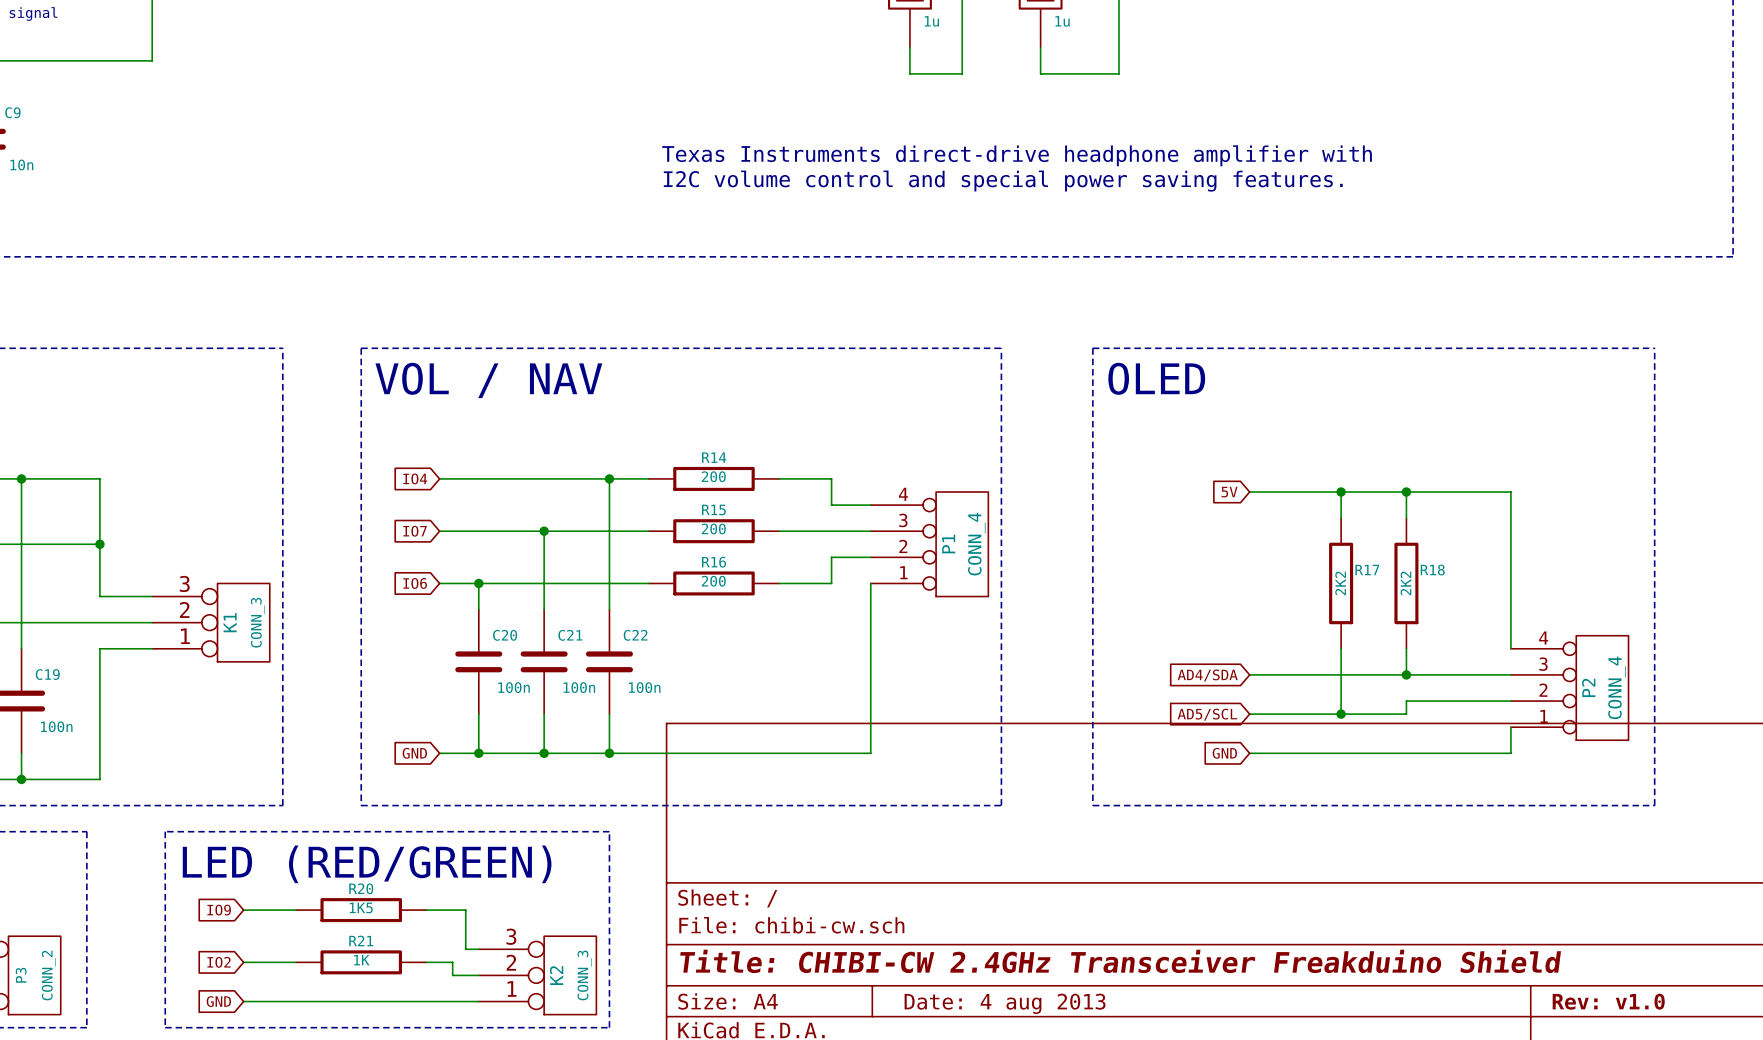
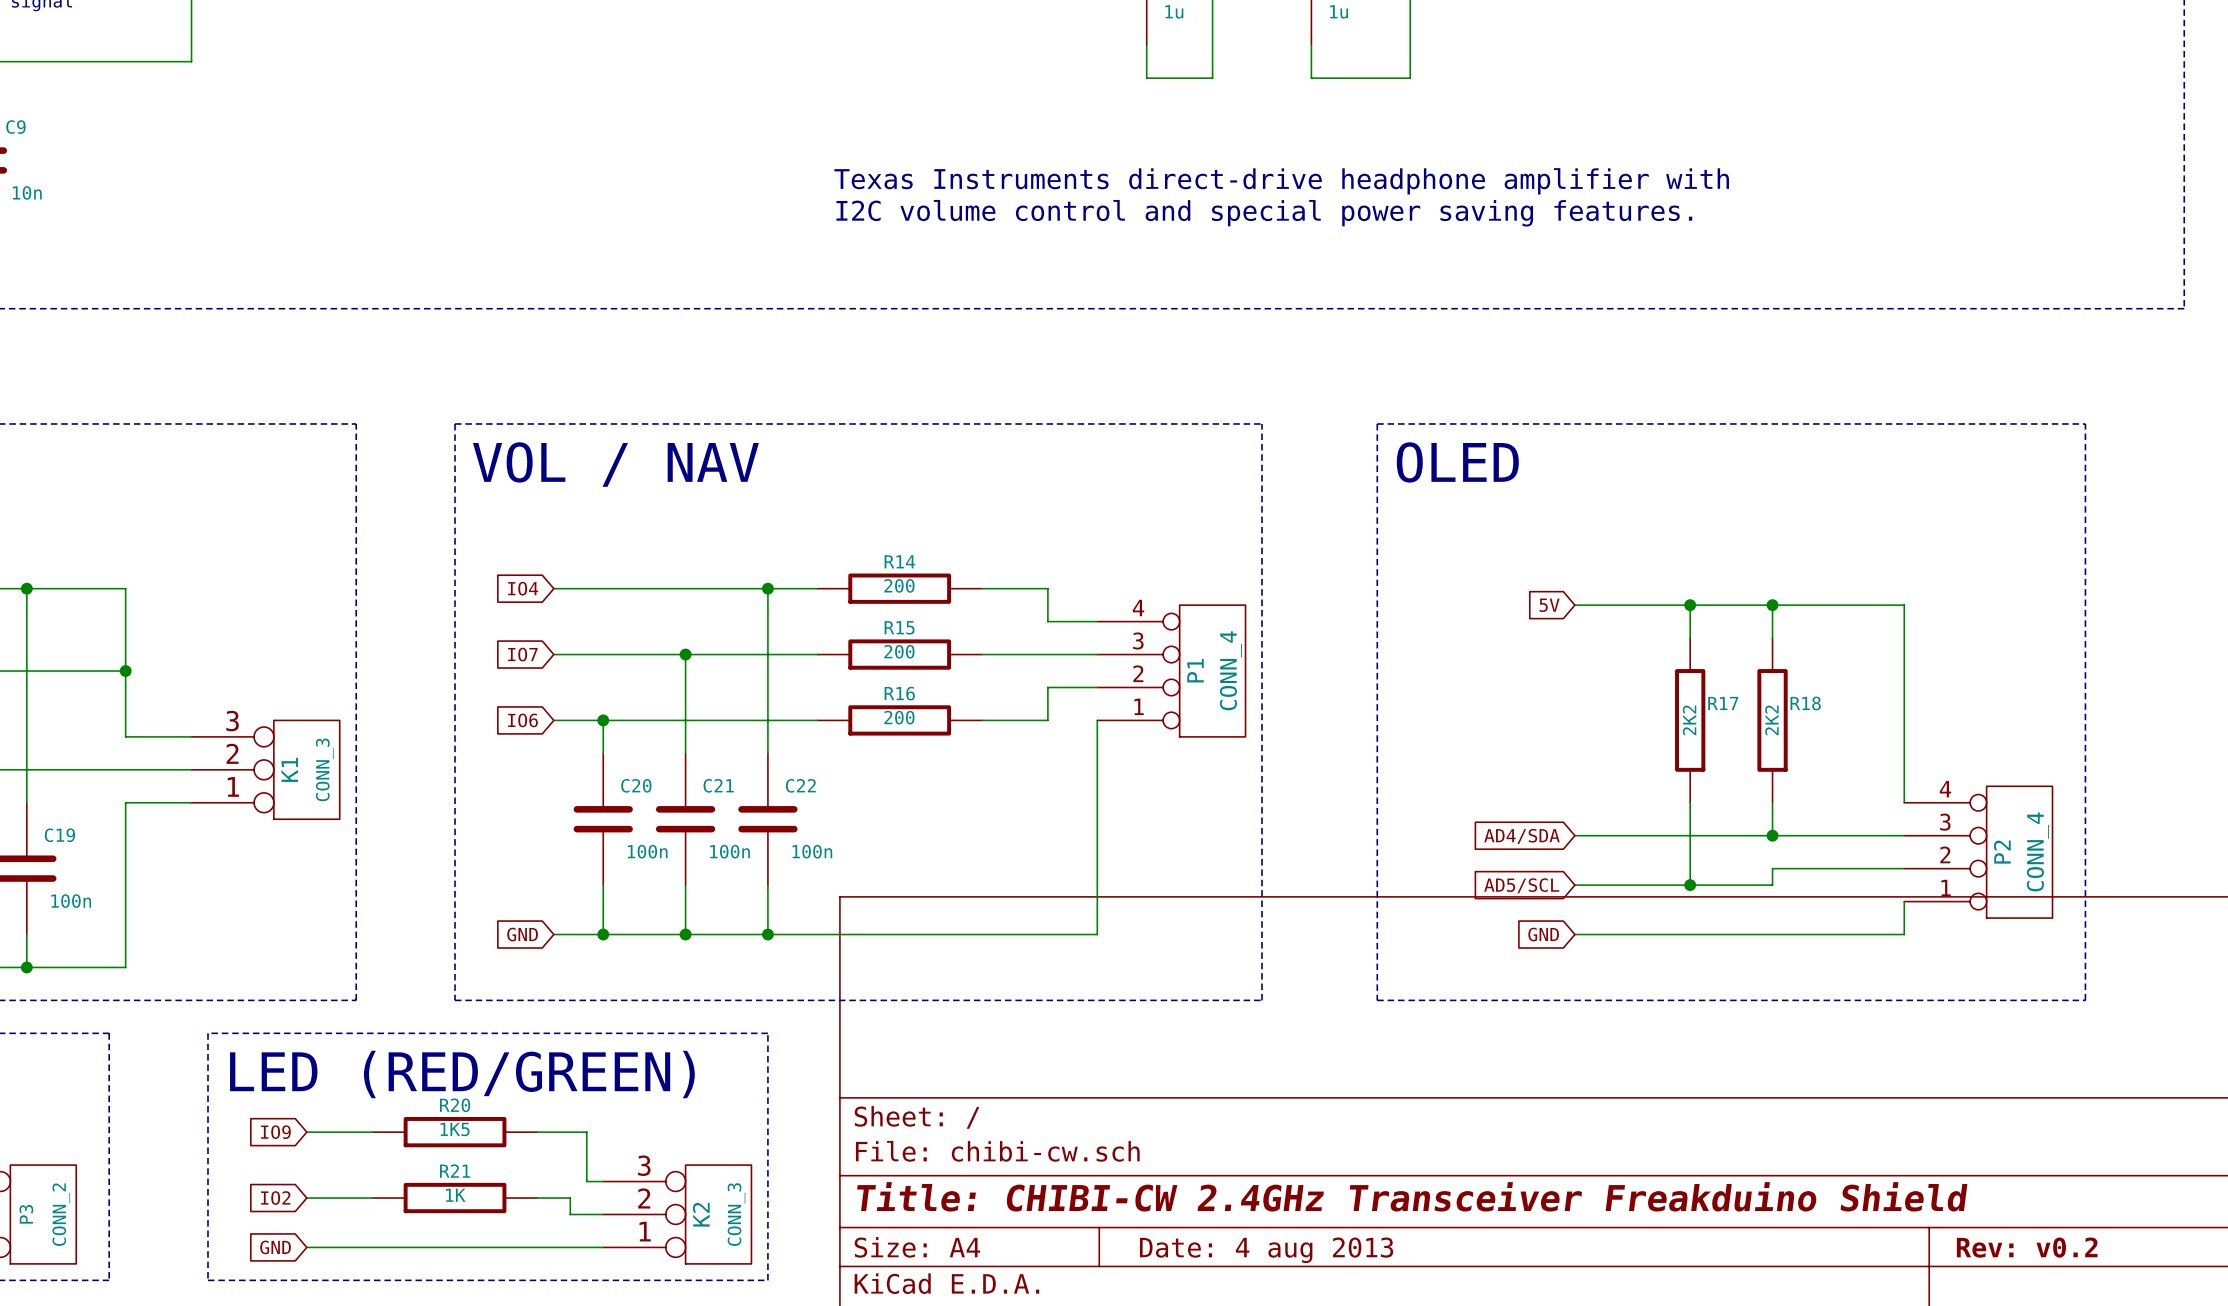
title block: Rev: v1.0 (1608, 1001) -> Rev: v0.2 (2027, 1247)

